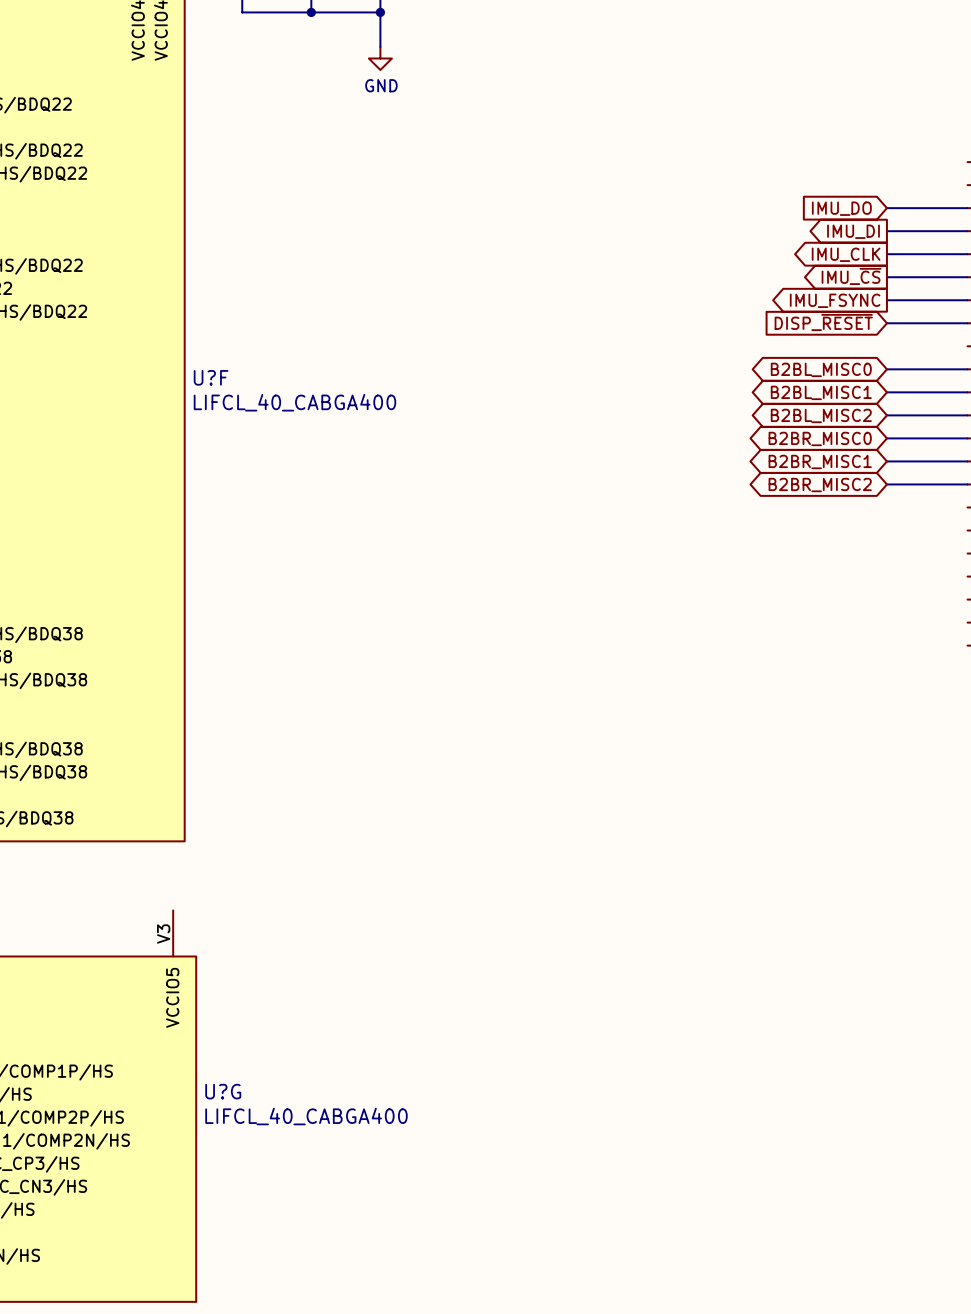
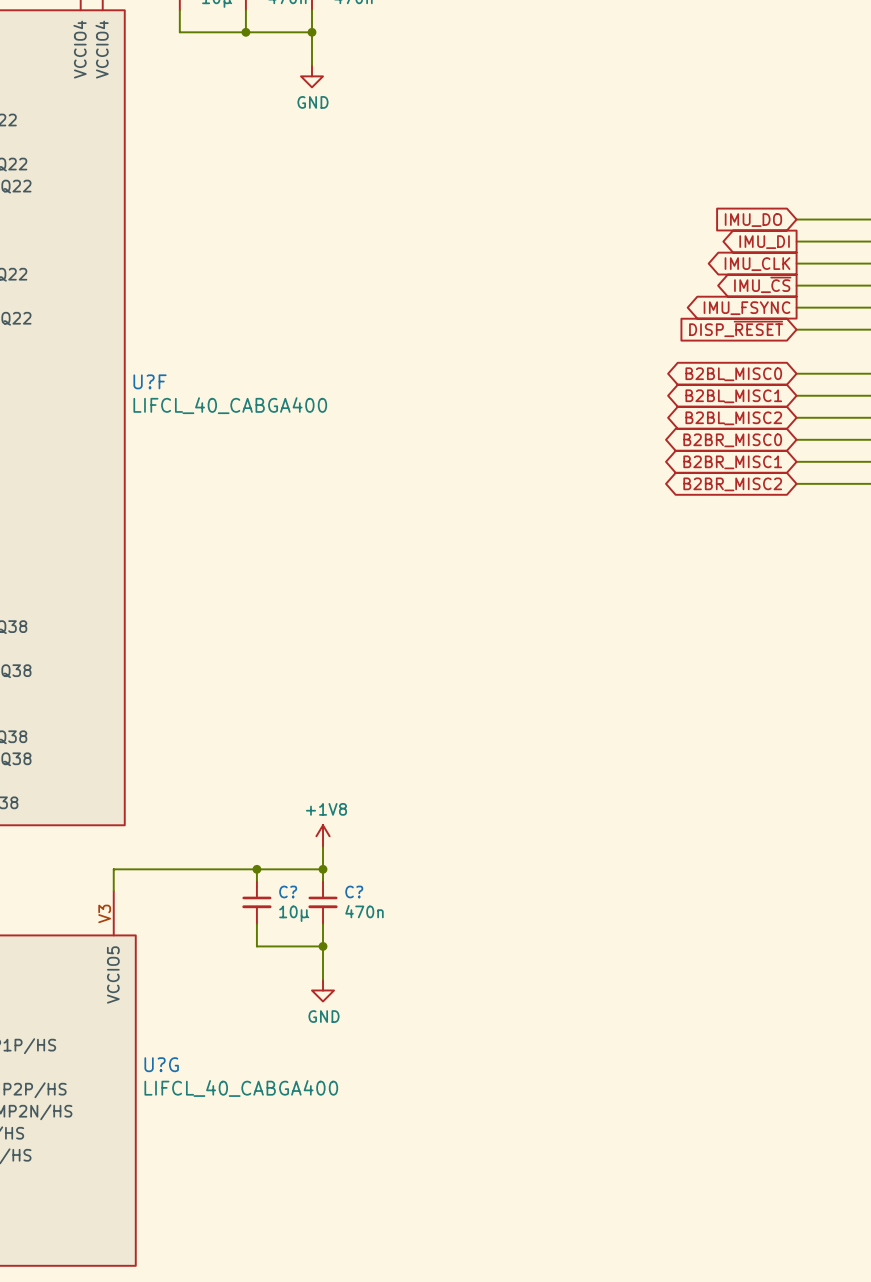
power symbol: none -> +1V8 (323, 836)
wire: none -> (323, 847) (323, 880)
wire: none -> (256, 869) (256, 880)
junction: none -> (256, 869)
wire: none -> (323, 869) (113, 869) (113, 891)
junction: none -> (323, 869)
C?: none -> 10µ (256, 902)
C?: none -> 470n (323, 902)
wire: none -> (256, 924) (256, 946) (323, 946)
wire: none -> (323, 924) (323, 979)
junction: none -> (323, 946)
power symbol: none -> GND (323, 990)

